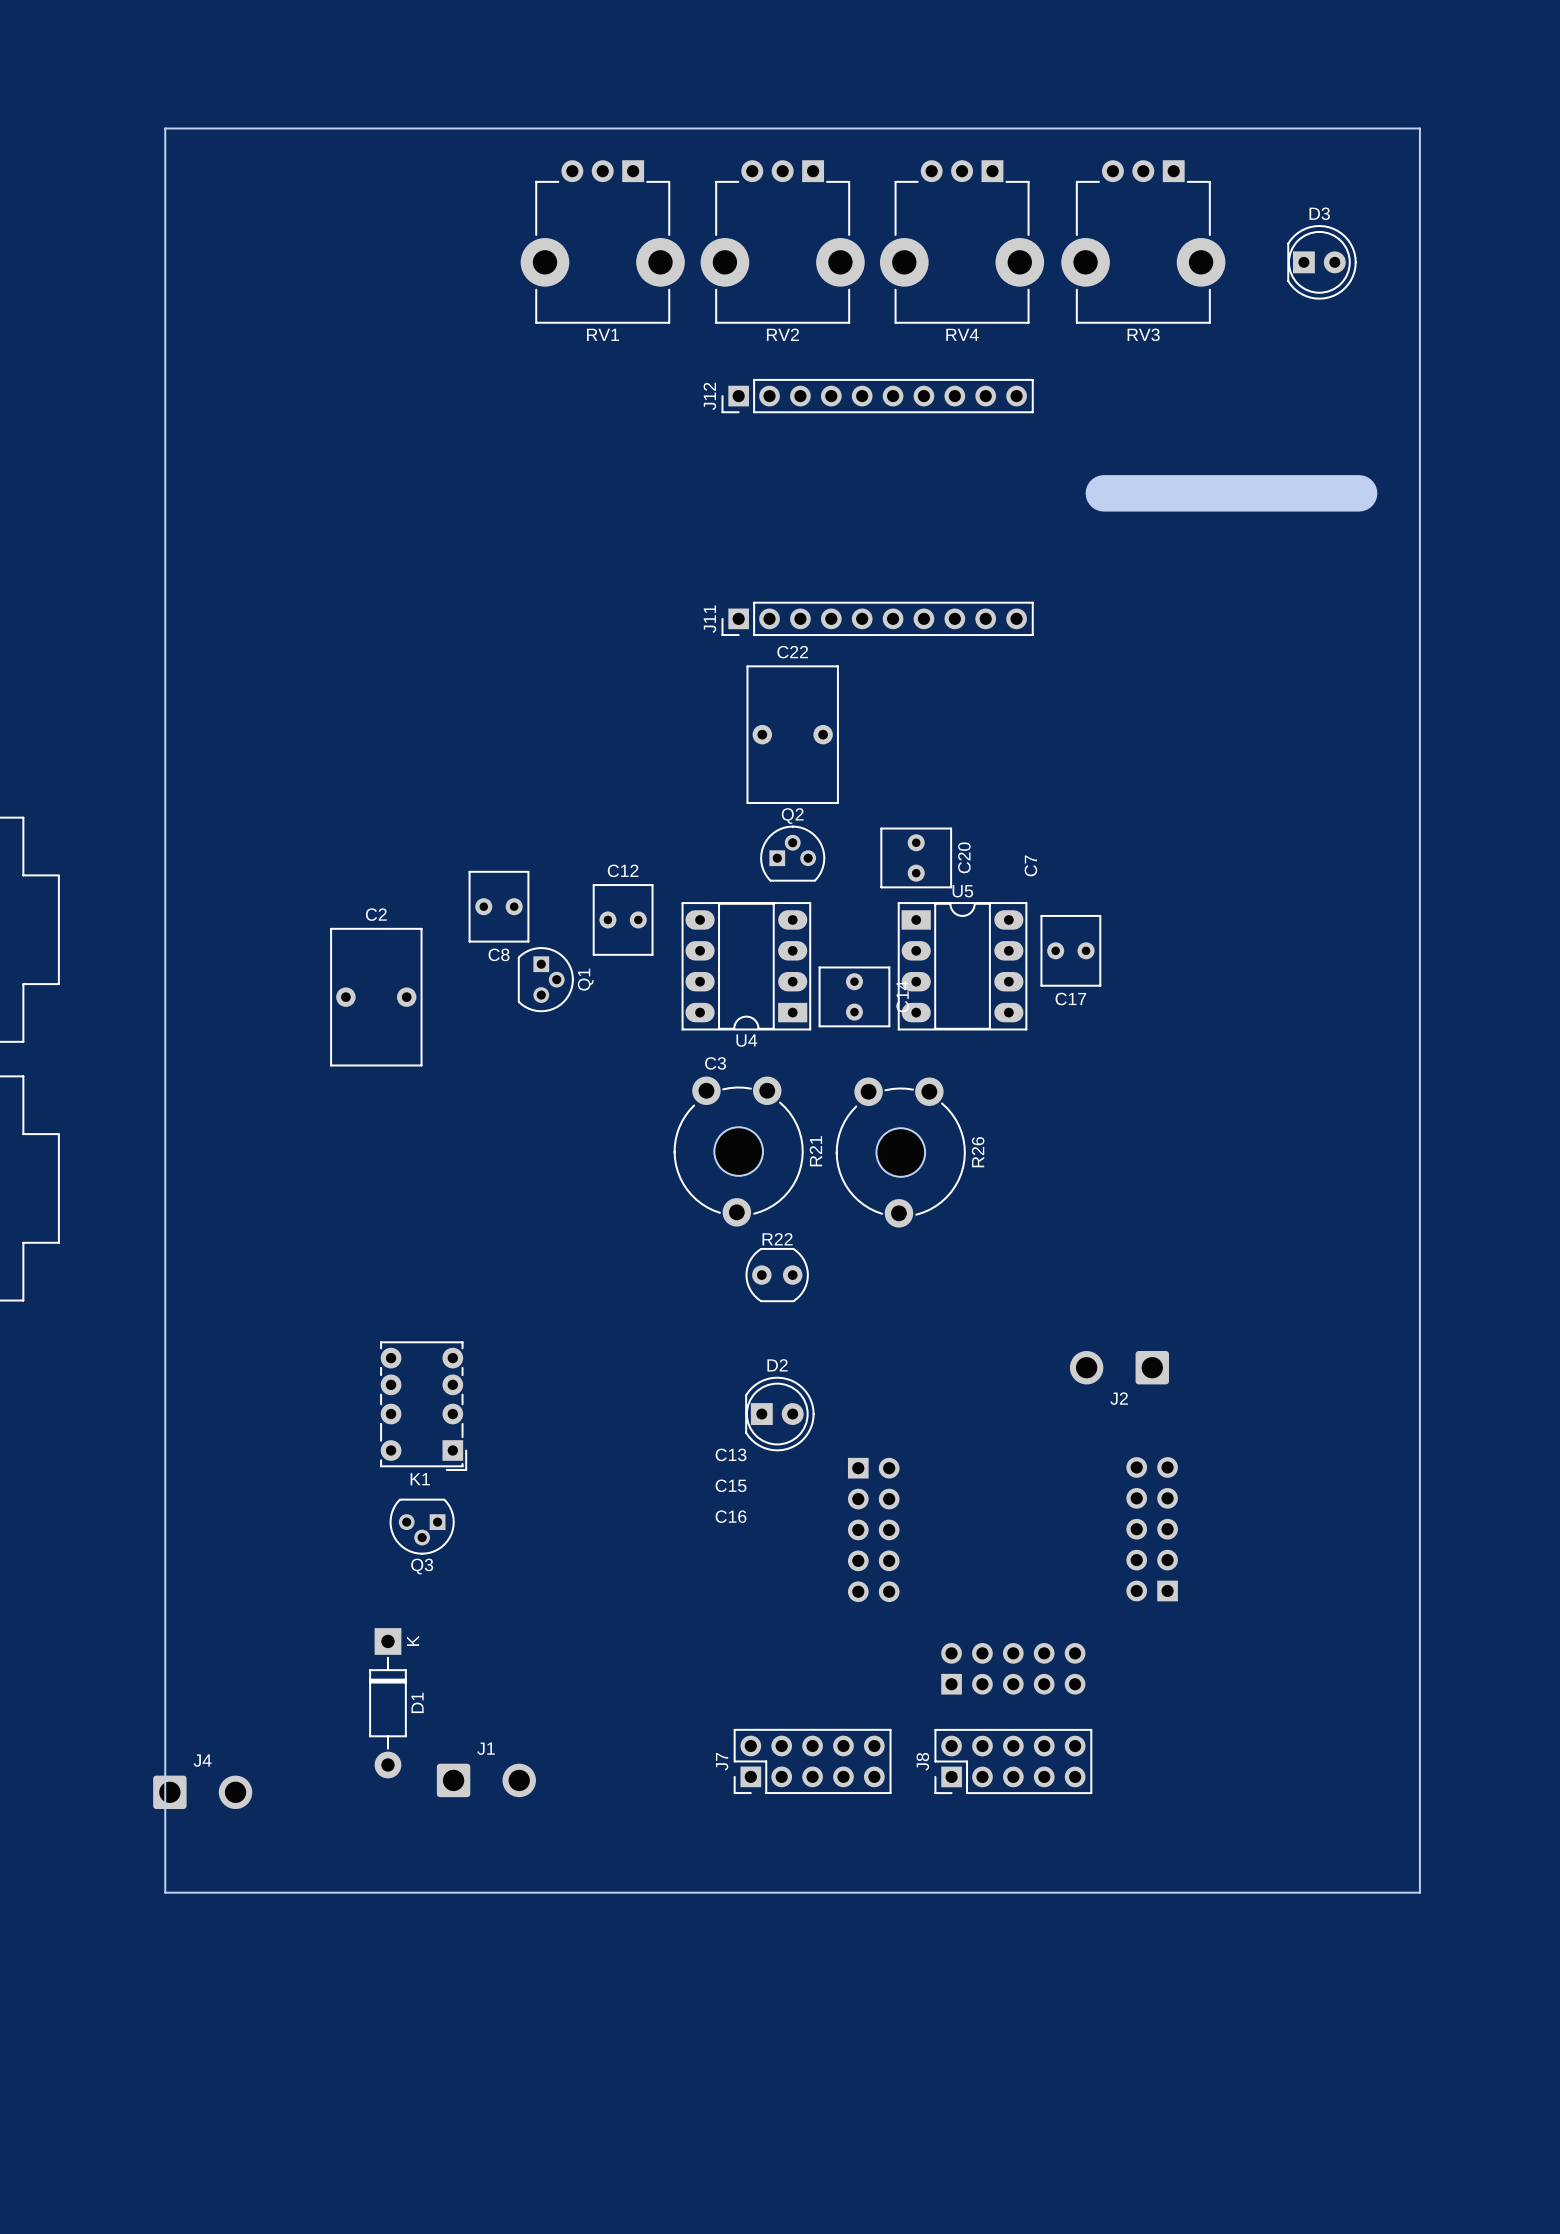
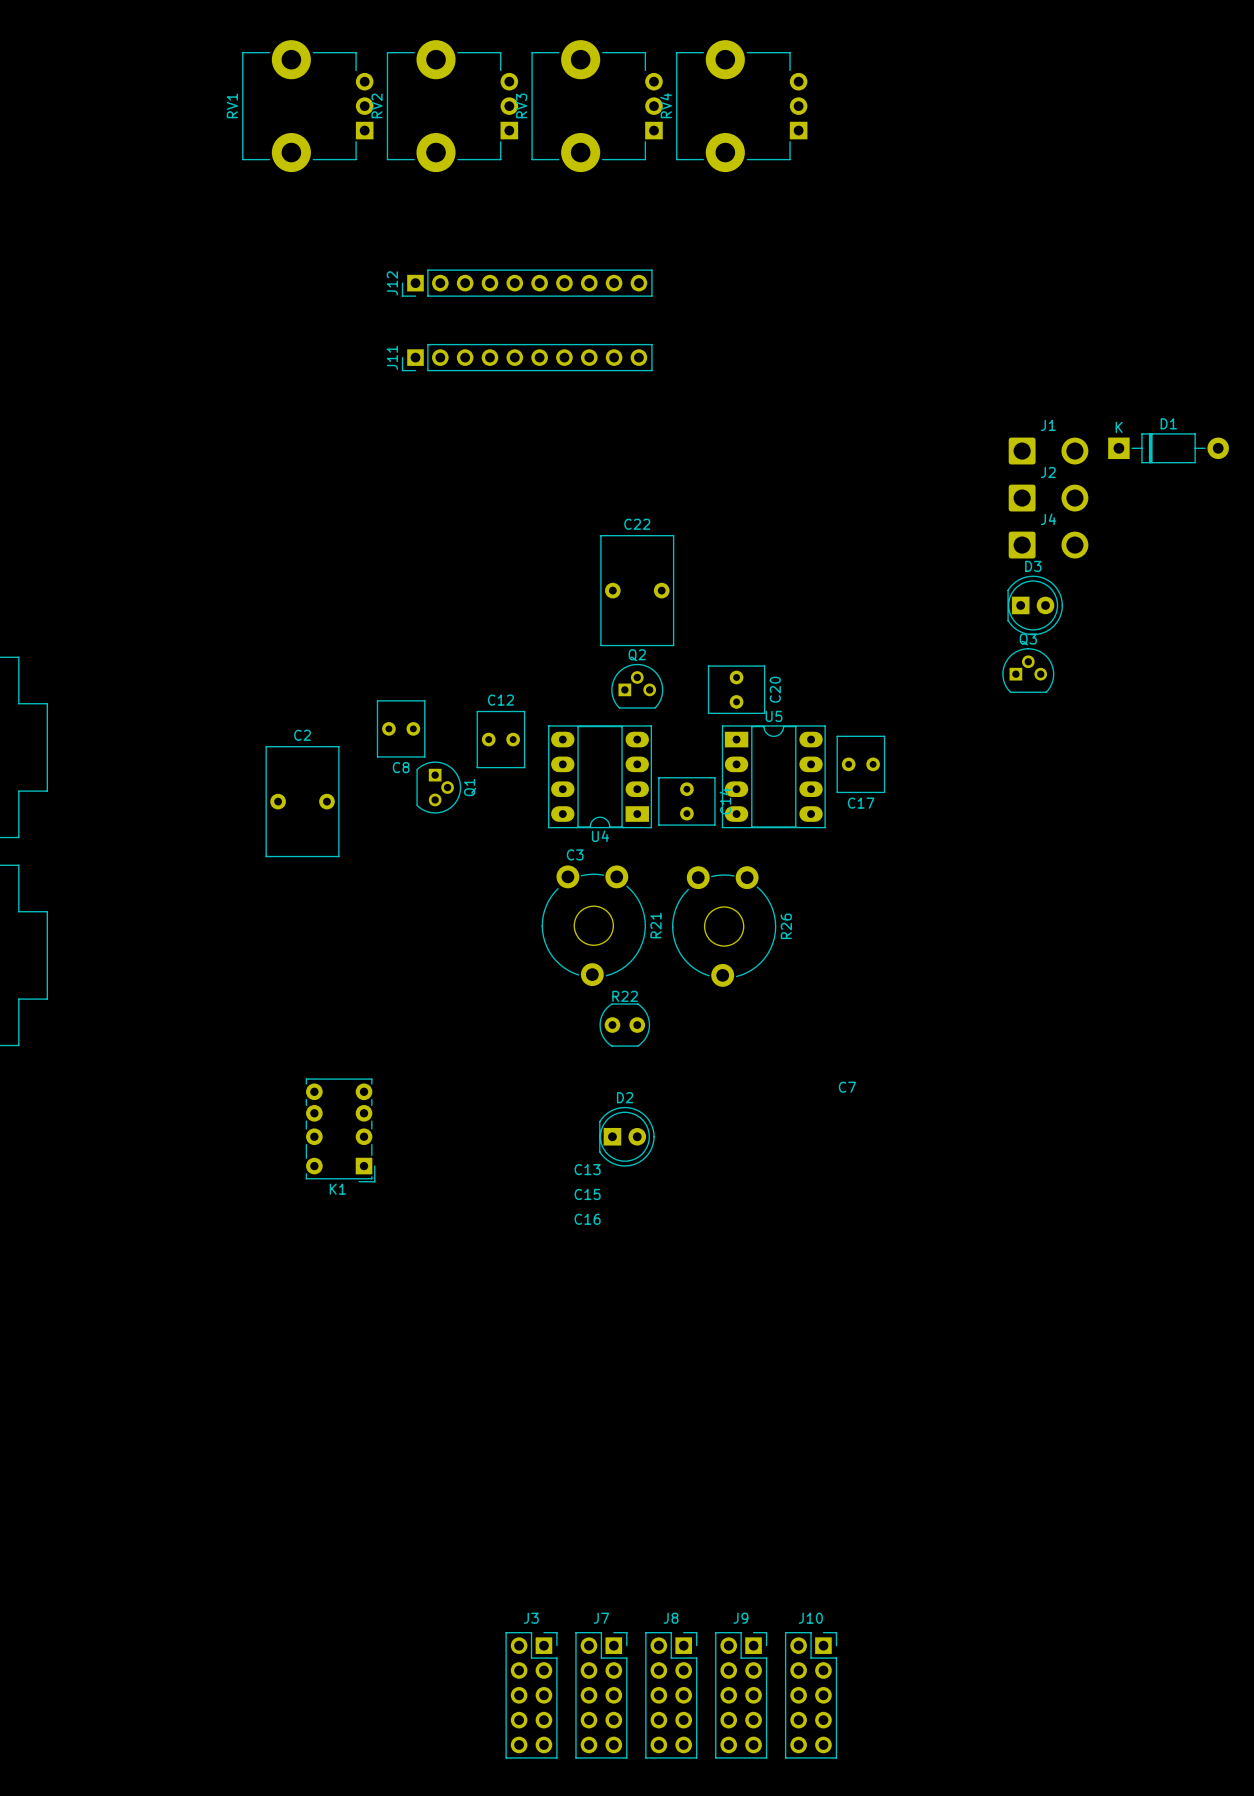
board edge: (165, 128) (1419, 128) (1419, 1892) (165, 1892) (165, 128) -> none
RV1 rotation: 0° (602, 241) -> 90° clockwise (307, 106)
RV1 position: (602, 241) -> (307, 106)
RV2 rotation: 0° (782, 241) -> 90° clockwise (452, 106)
RV2 position: (782, 241) -> (452, 106)
RV4 rotation: 0° (962, 241) -> 90° clockwise (741, 106)
RV4 position: (962, 241) -> (741, 106)
RV3 rotation: 0° (1143, 241) -> 90° clockwise (597, 106)
RV3 position: (1143, 241) -> (597, 106)
D3 position: (1321, 262) -> (1035, 605)
J12 position: (877, 396) -> (527, 283)
board edge: (1103, 493) (1359, 493) -> none
J11 position: (877, 618) -> (527, 357)
C7 position: (1030, 865) -> (847, 1087)
C7 name rotation: 0° (1030, 865) -> 90° clockwise (847, 1087)
J2 rotation: 0° (1119, 1367) -> 180° (1048, 498)
J2 position: (1119, 1367) -> (1048, 498)
Q3 rotation: 0° (422, 1526) -> 180° (1028, 670)
Q3 position: (422, 1526) -> (1028, 670)
part: (873, 1529) -> none
part: (1152, 1529) -> none
part: (1013, 1668) -> none
D1 rotation: 0° (387, 1703) -> 90° counterclockwise (1168, 448)
D1 position: (387, 1703) -> (1168, 448)
J7 footprint: [733, 1729, 892, 1794] -> [575, 1632, 628, 1759]
J8 footprint: [934, 1729, 1093, 1794] -> [645, 1632, 698, 1759]
J7 name position: J7 (722, 1761) -> J7 (601, 1618)
J8 name position: J8 (922, 1761) -> J8 (671, 1618)
J1 position: (486, 1780) -> (1048, 451)
J4 position: (202, 1792) -> (1048, 545)
J3: none -> (531, 1695)
J9: none -> (741, 1695)
J10: none -> (811, 1695)

